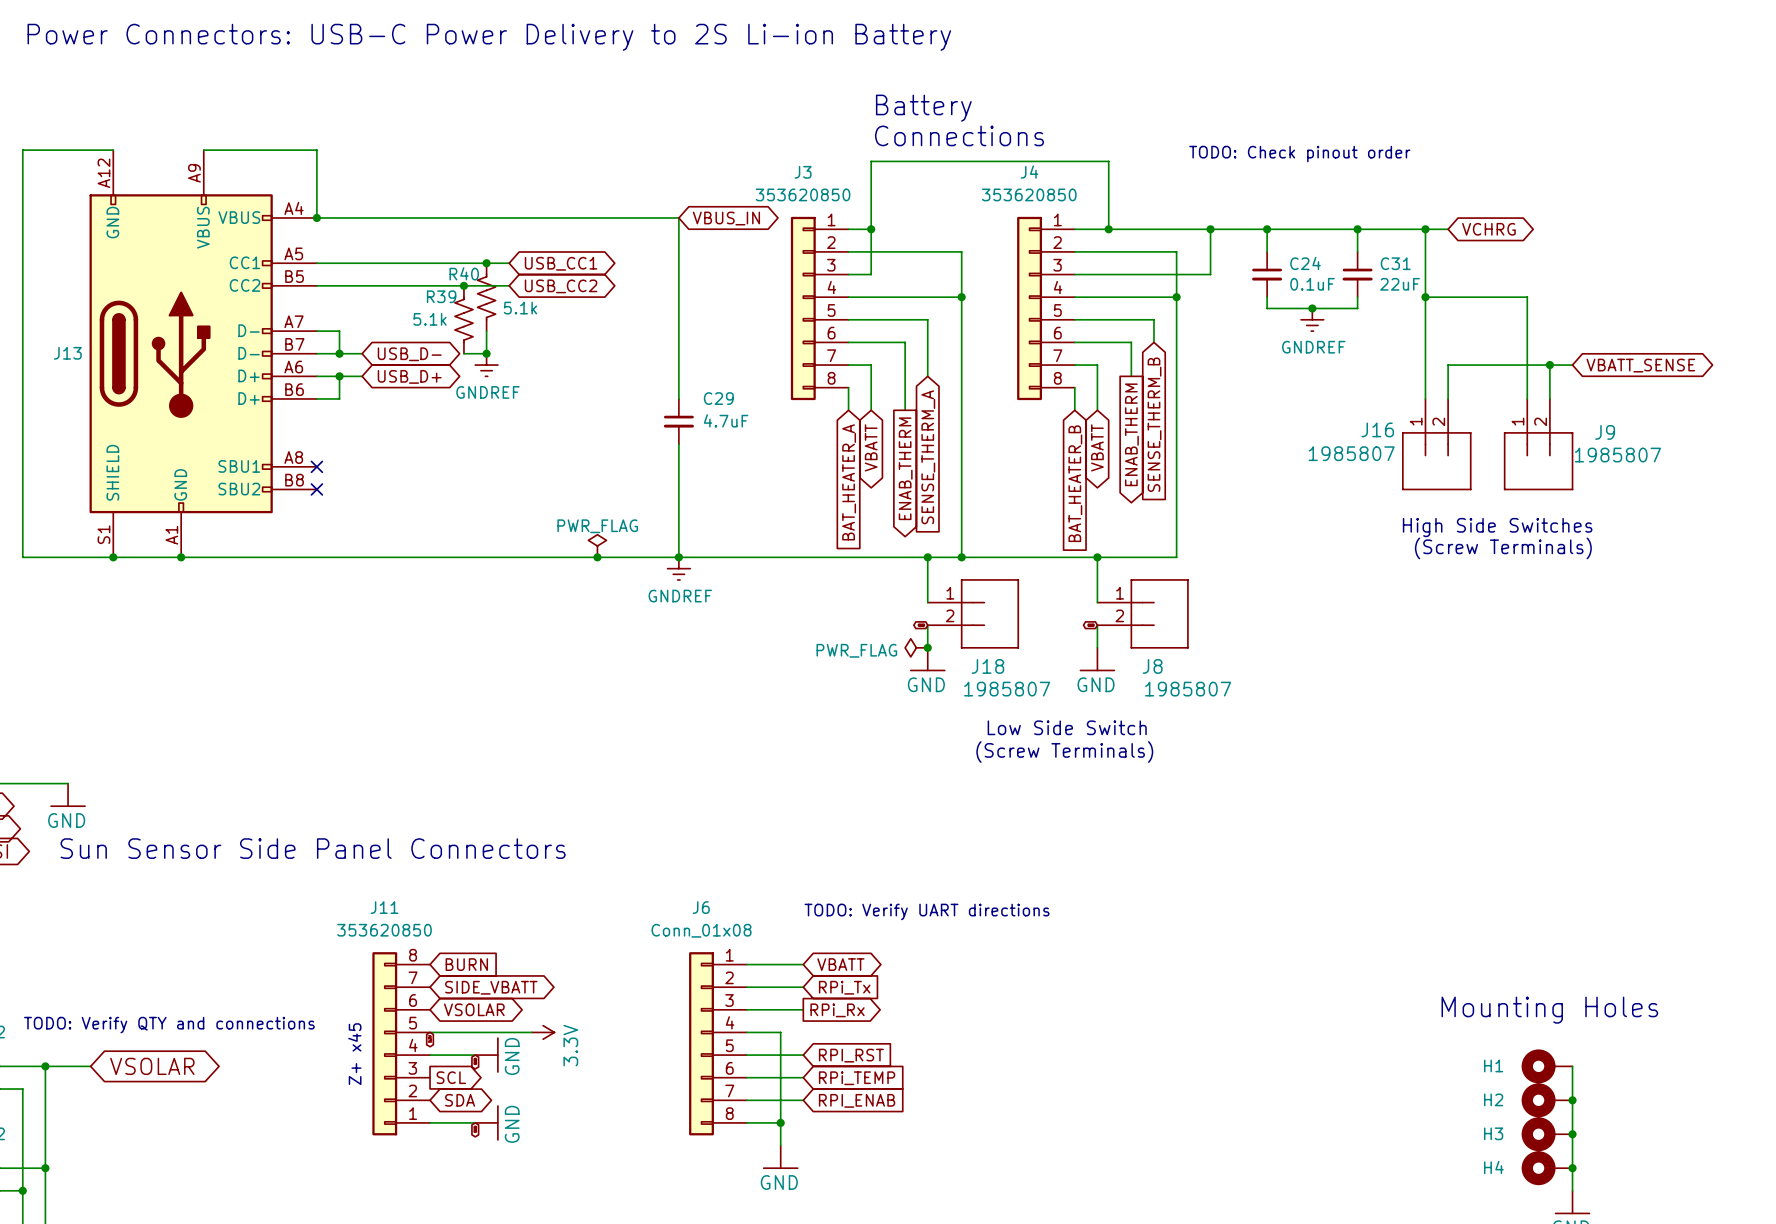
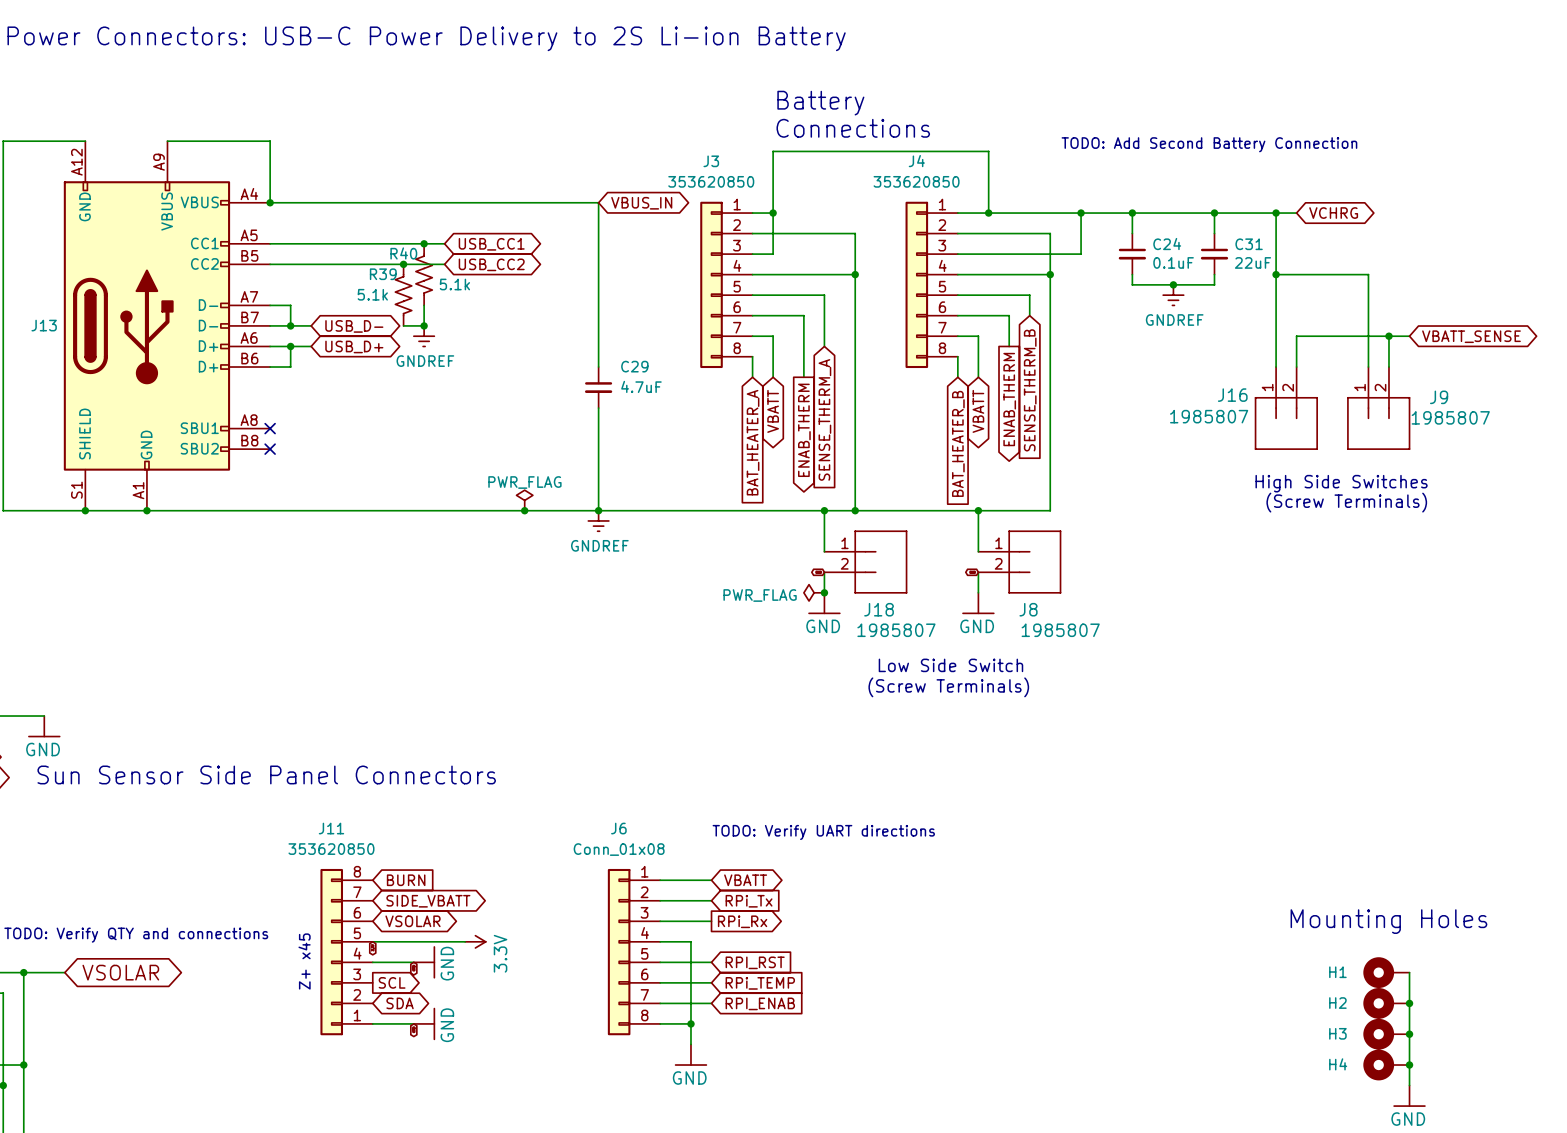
text: TODO: Check pinout order (1299, 154) -> TODO: Add Second Battery Connection (1209, 144)

